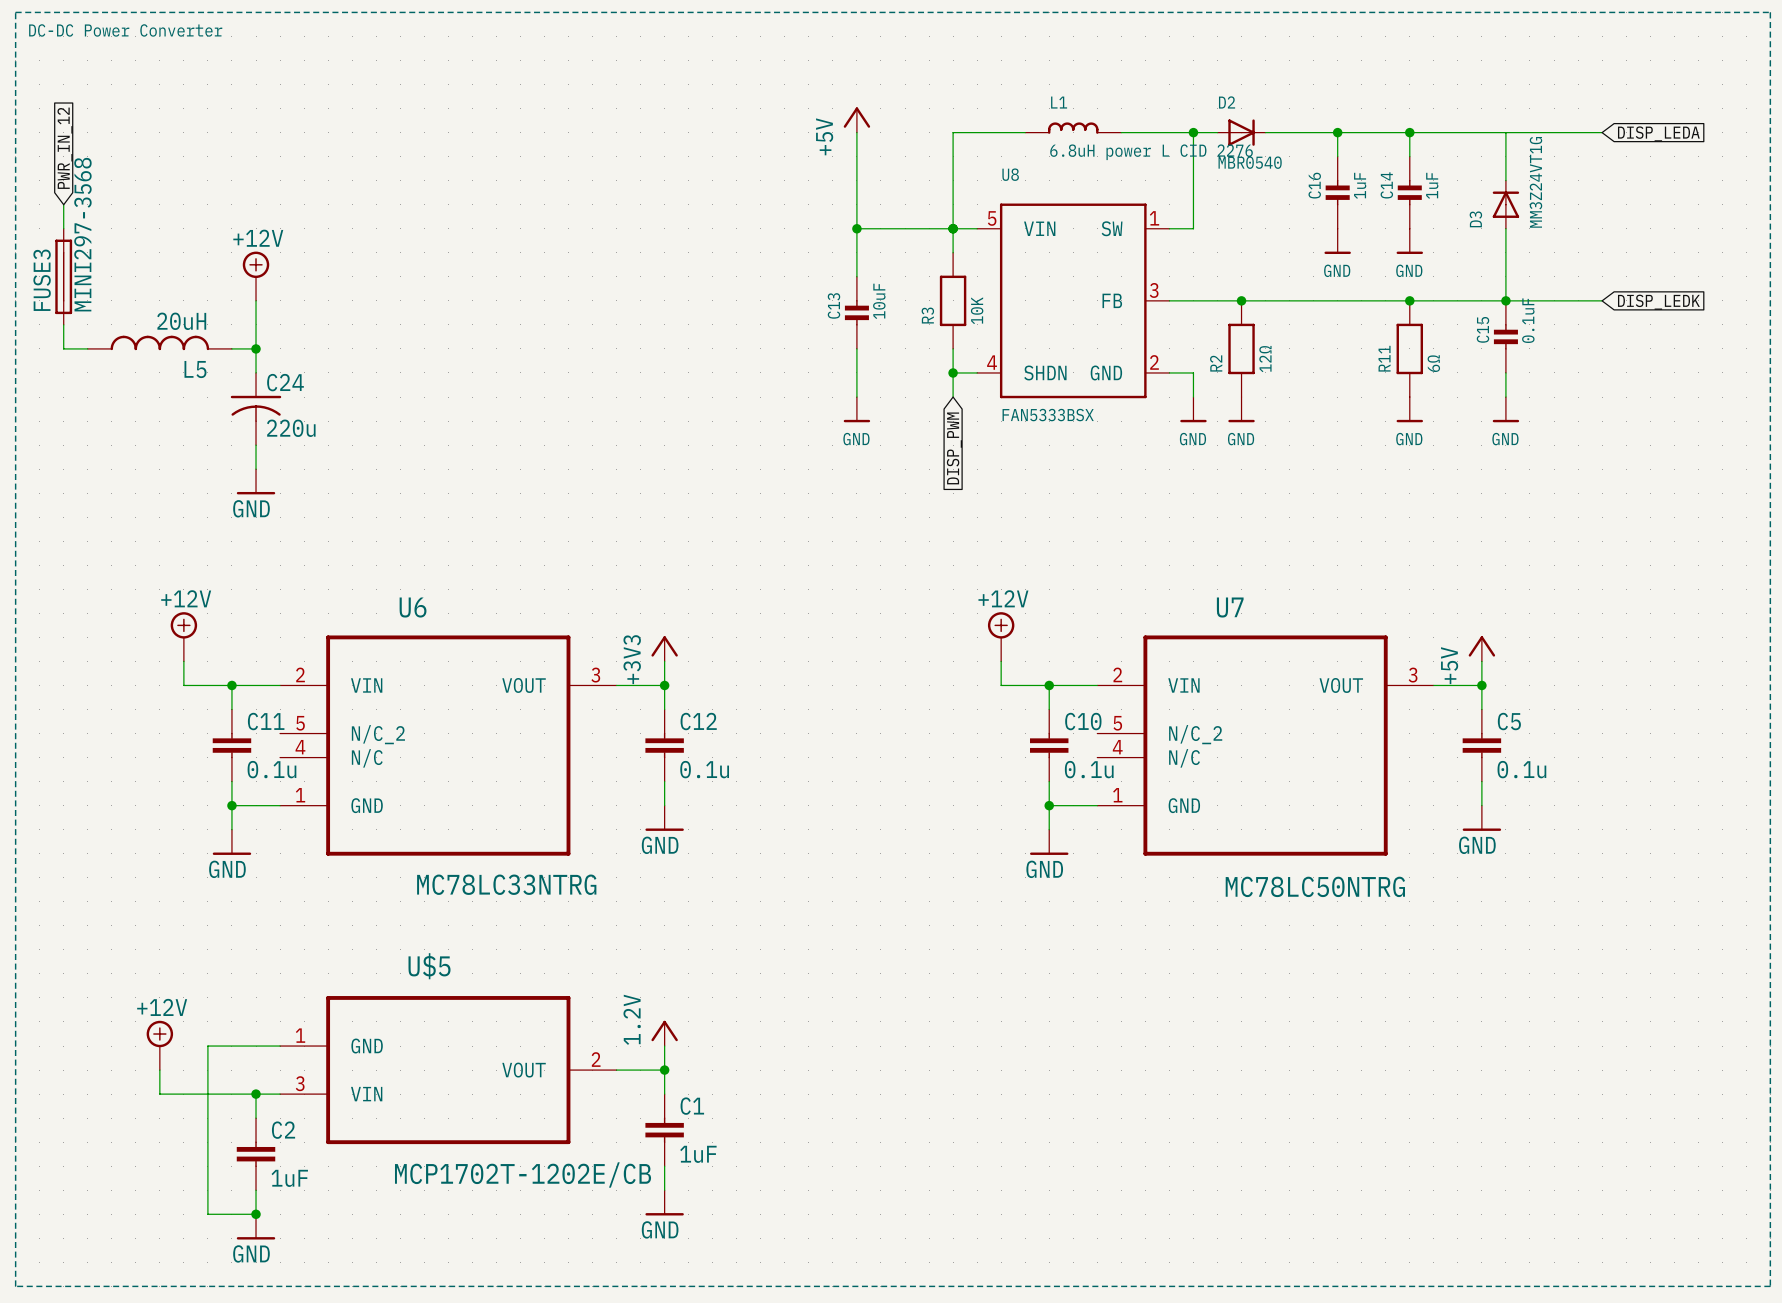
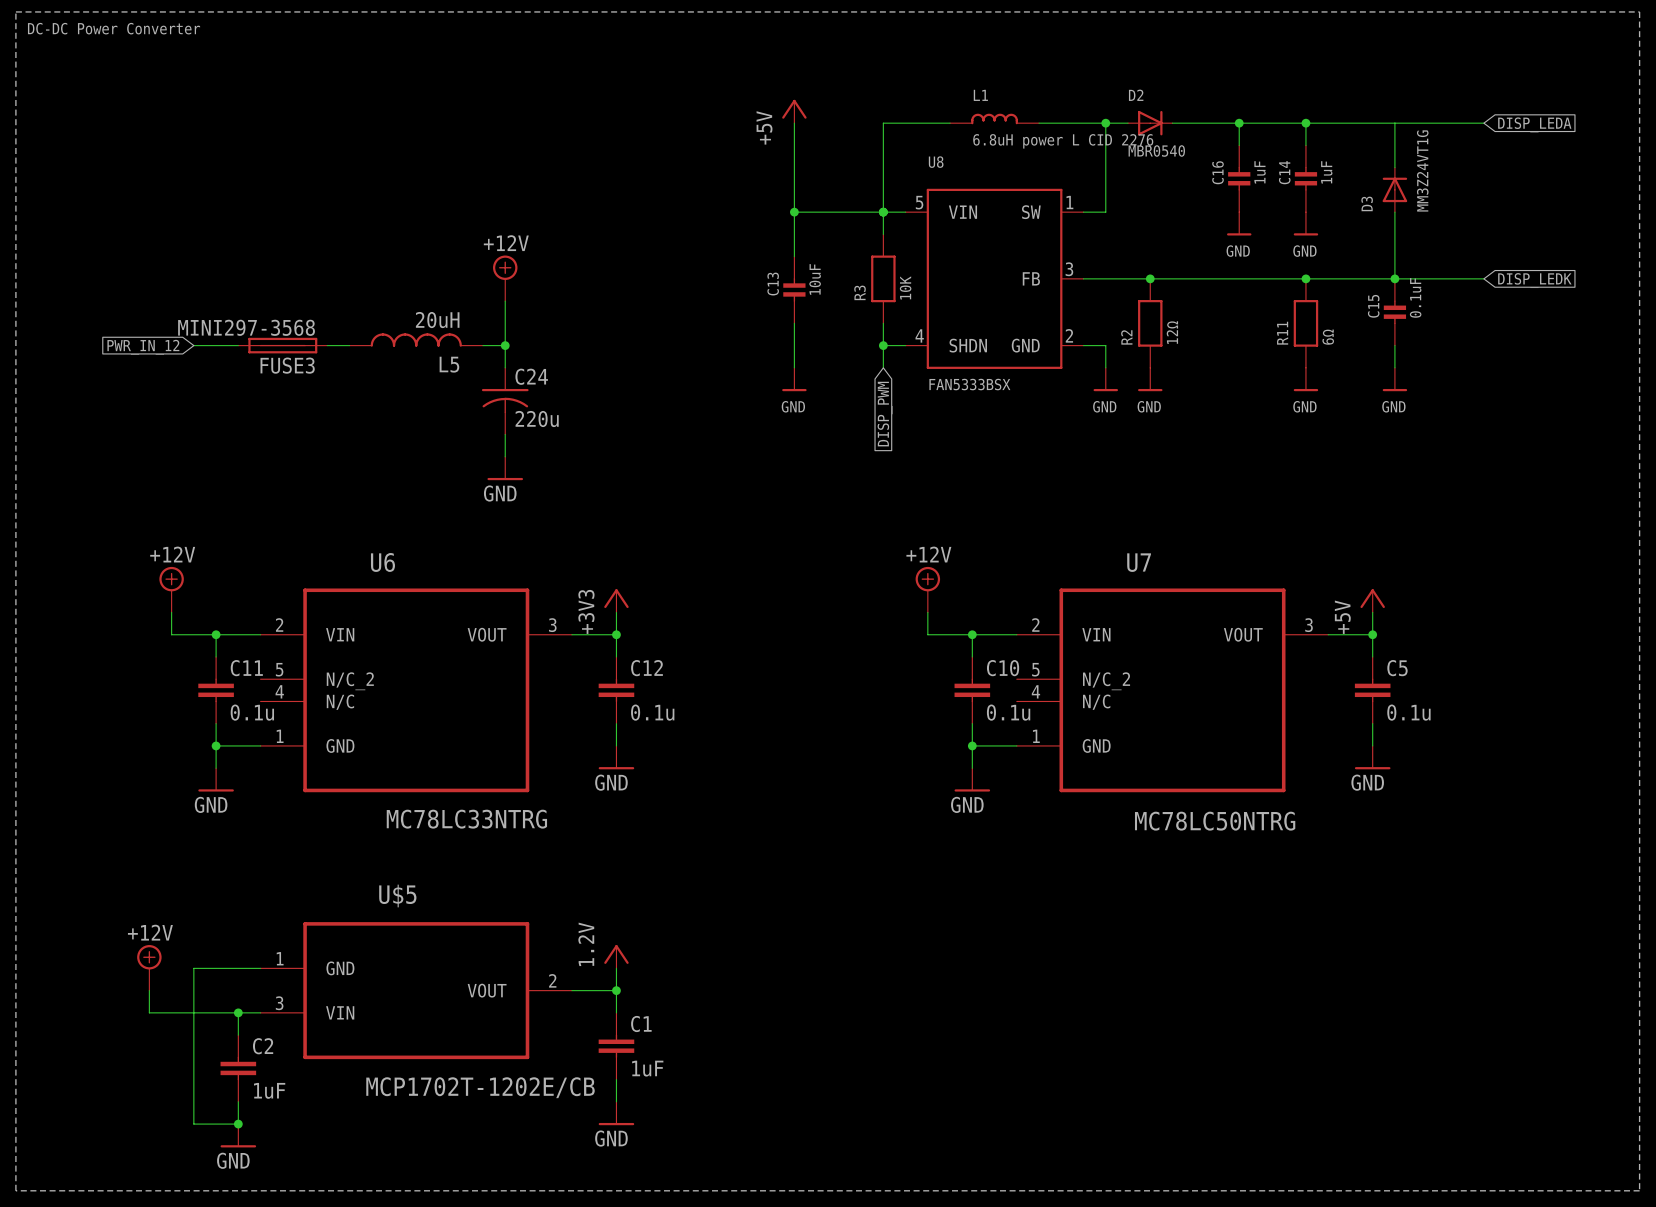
global label rotation: 0° (65, 148) -> 90° counterclockwise (143, 347)
global label position: PWR_IN_12 (65, 148) -> PWR_IN_12 (143, 347)
wire: (63, 204) (63, 228) -> none
FUSE3 value position: MINI297-3568 (82, 234) -> MINI297-3568 (246, 327)
FUSE3 rotation: 0° (63, 276) -> 90° clockwise (282, 345)
FUSE3 position: (63, 276) -> (282, 345)
power symbol: +12V (256, 276) -> none
FUSE3 name position: FUSE3 (42, 280) -> FUSE3 (287, 365)
wire: (256, 300) (256, 372) -> (193, 345) (238, 345)
power symbol: none -> +12V (505, 278)
wire: (63, 324) (63, 348) (87, 348) -> none
wire: none -> (505, 301) (505, 367)
L5 position: (159, 342) -> (416, 340)
wire: (231, 348) (256, 348) -> (327, 345) (349, 345)
junction: (256, 348) -> none
wire: none -> (483, 345) (505, 345)
junction: none -> (505, 345)
C24 position: (256, 409) -> (505, 401)
wire: (256, 445) (256, 469) -> none
wire: none -> (505, 434) (505, 456)
power symbol: GND (256, 481) -> none
power symbol: none -> GND (505, 468)

